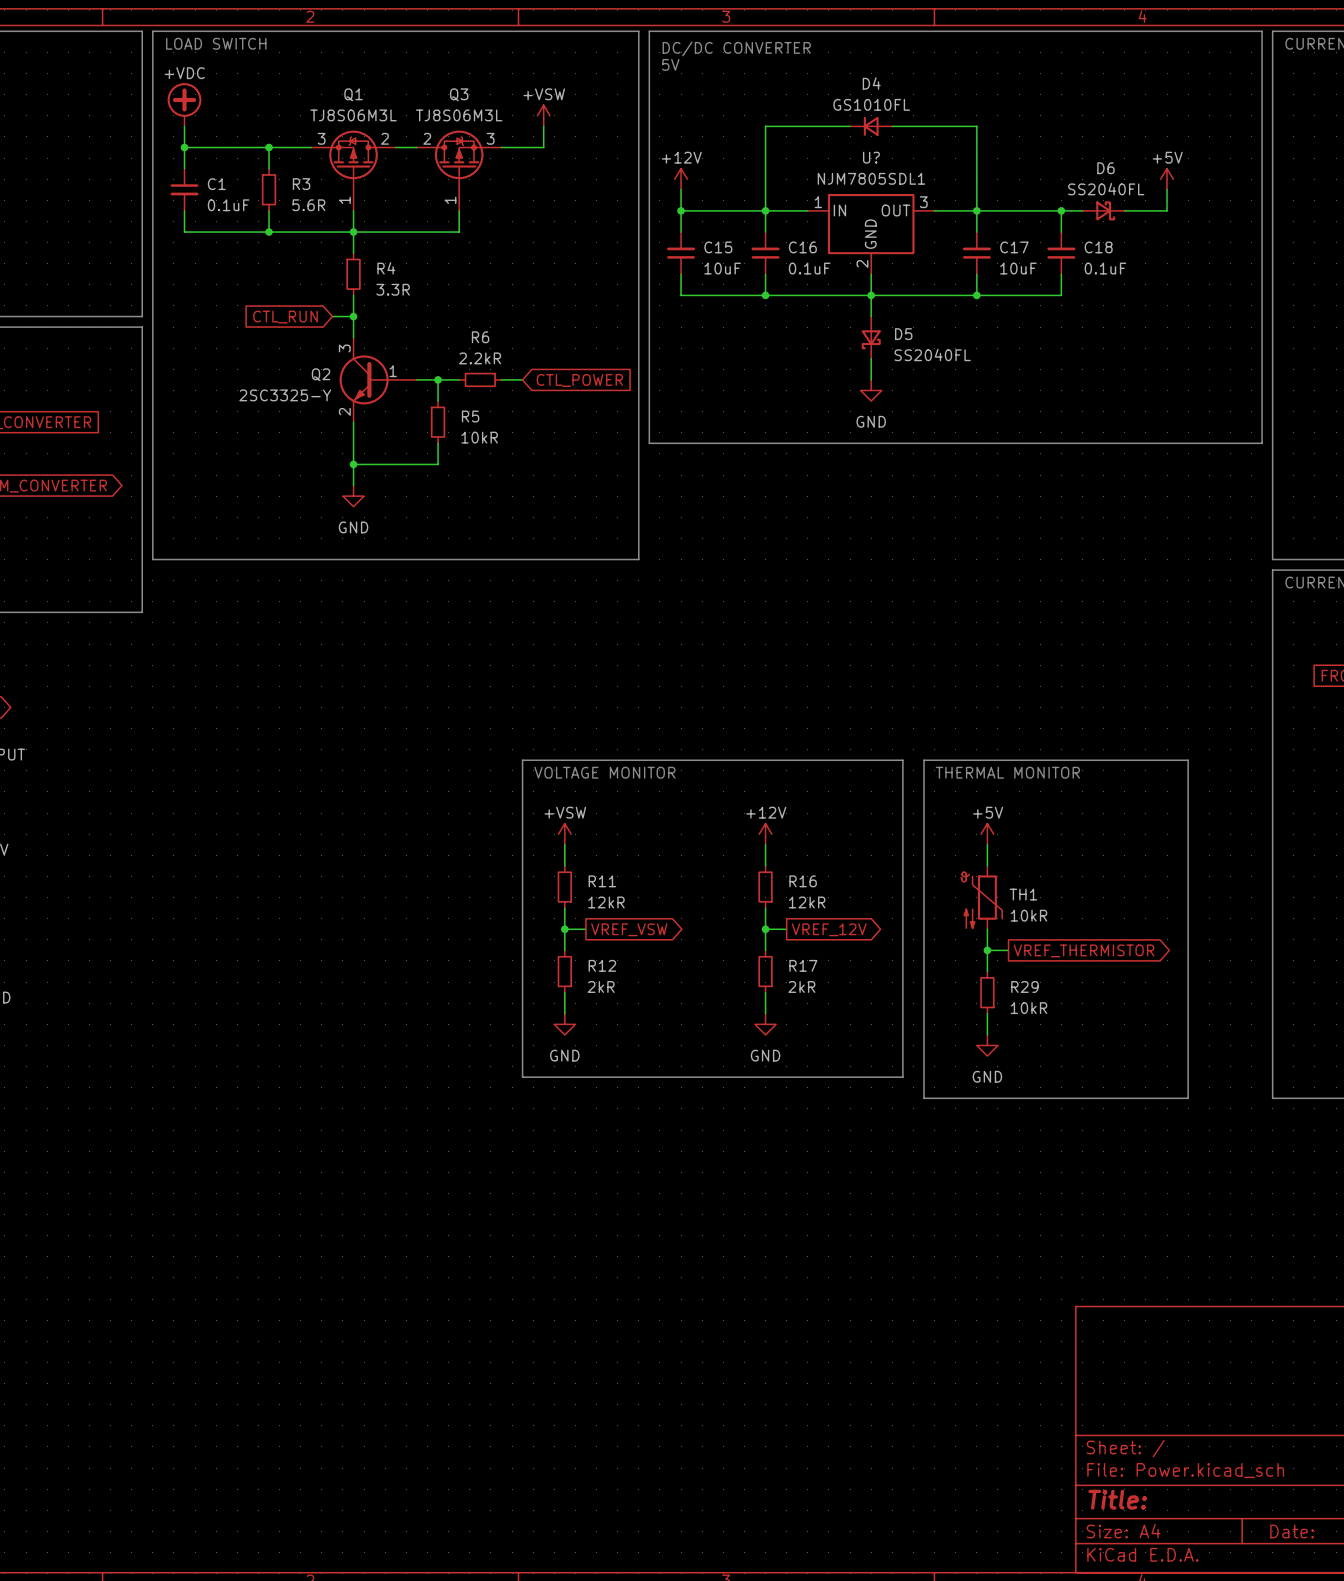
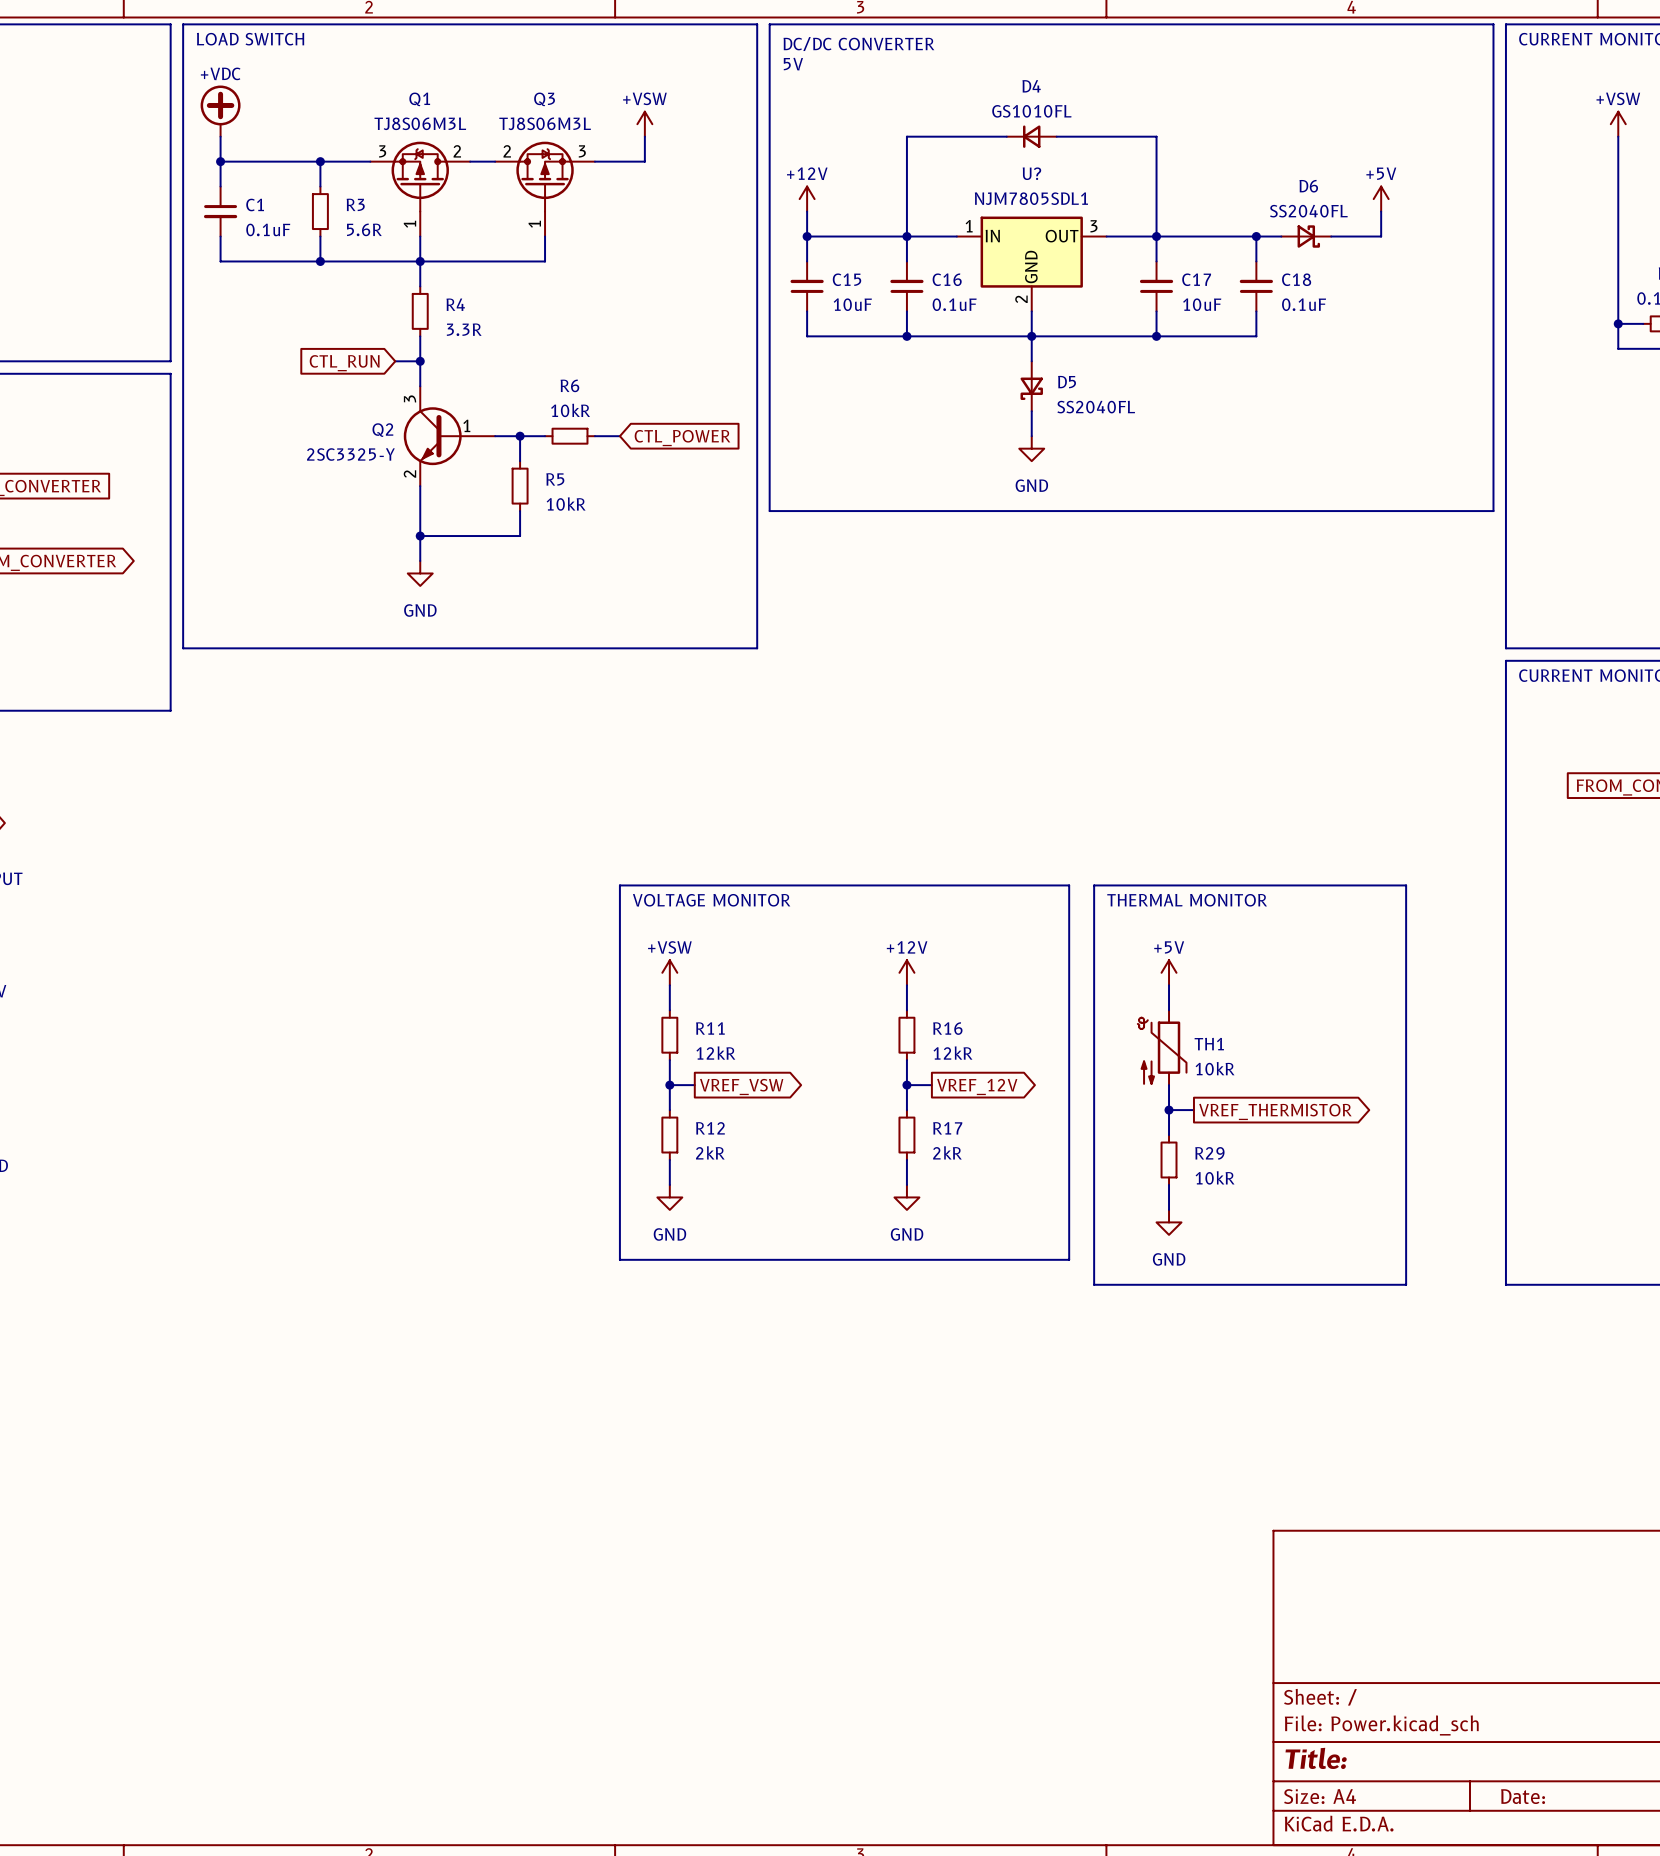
R6 value: 2.2kR (480, 358) -> 10kR (570, 410)

